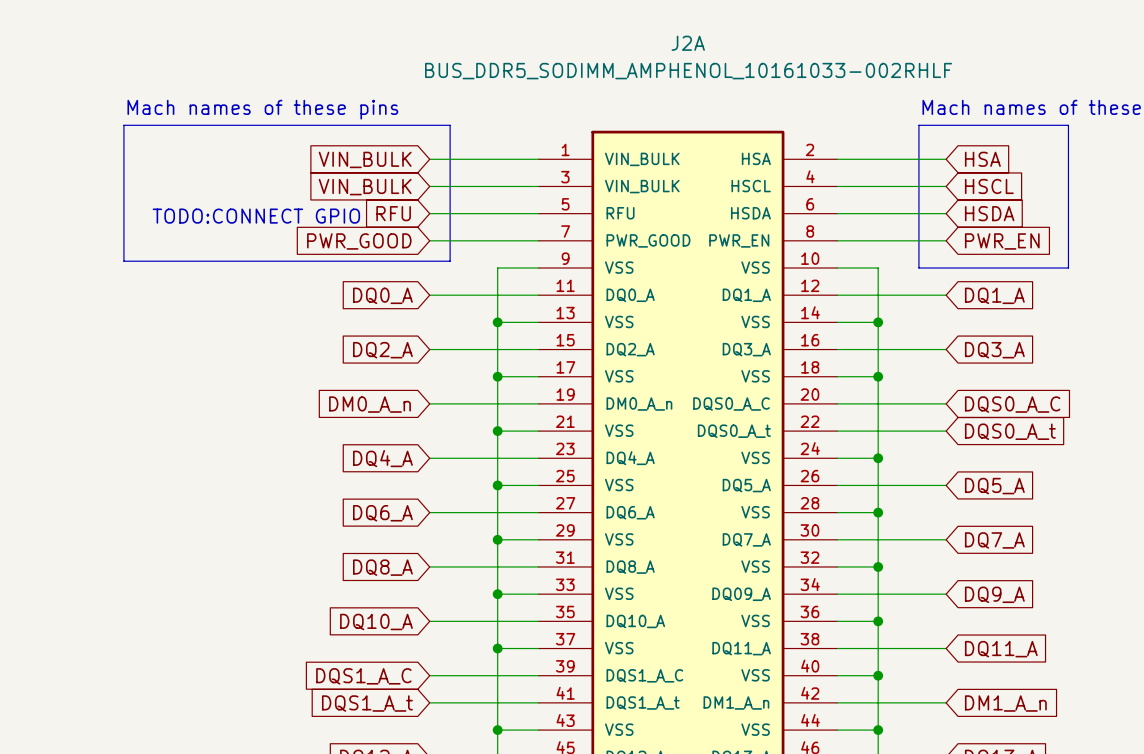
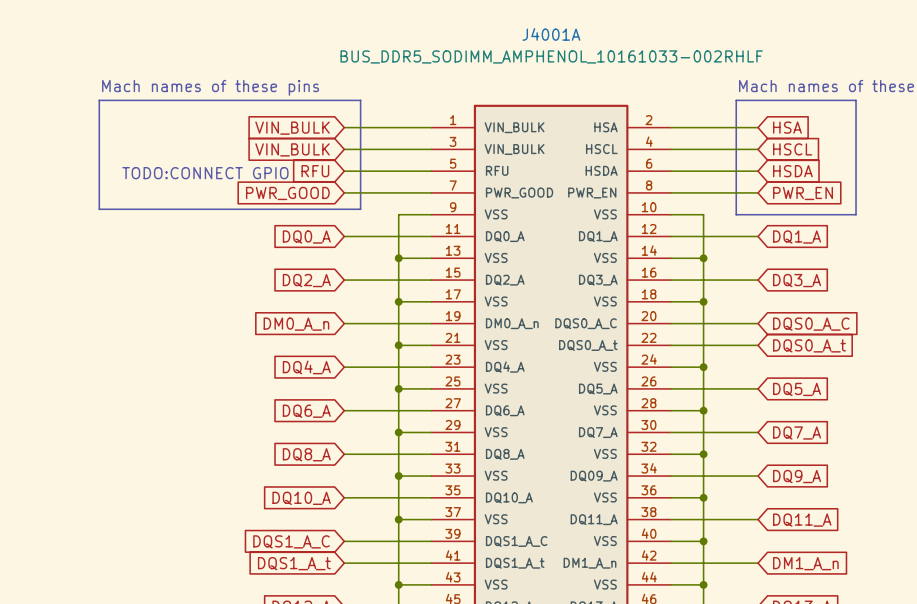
J2A name: J2A (688, 43) -> J4001A (551, 34)

